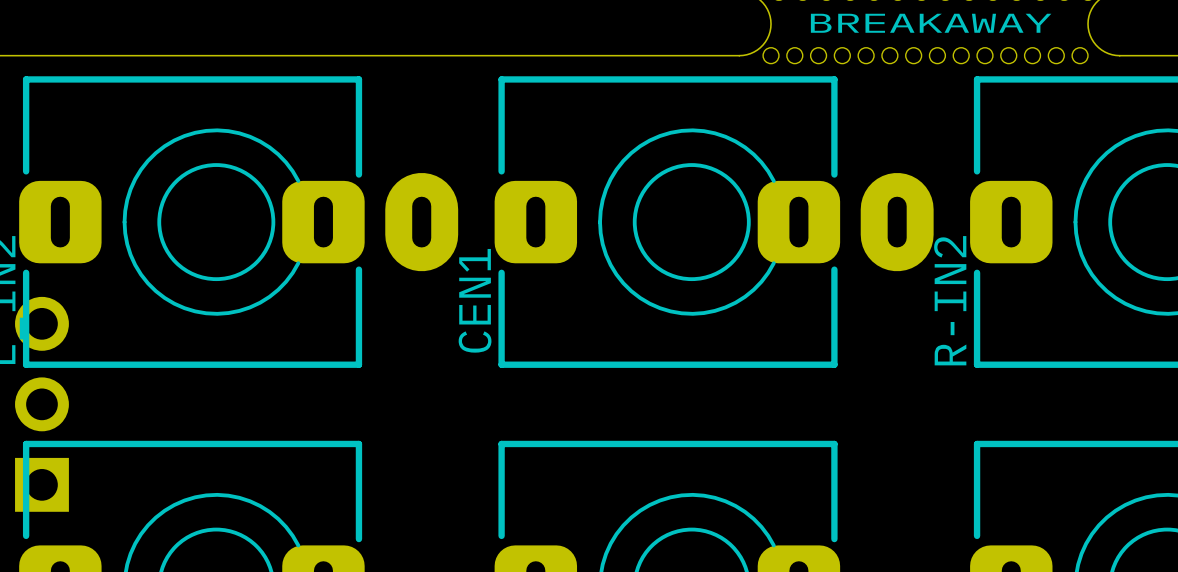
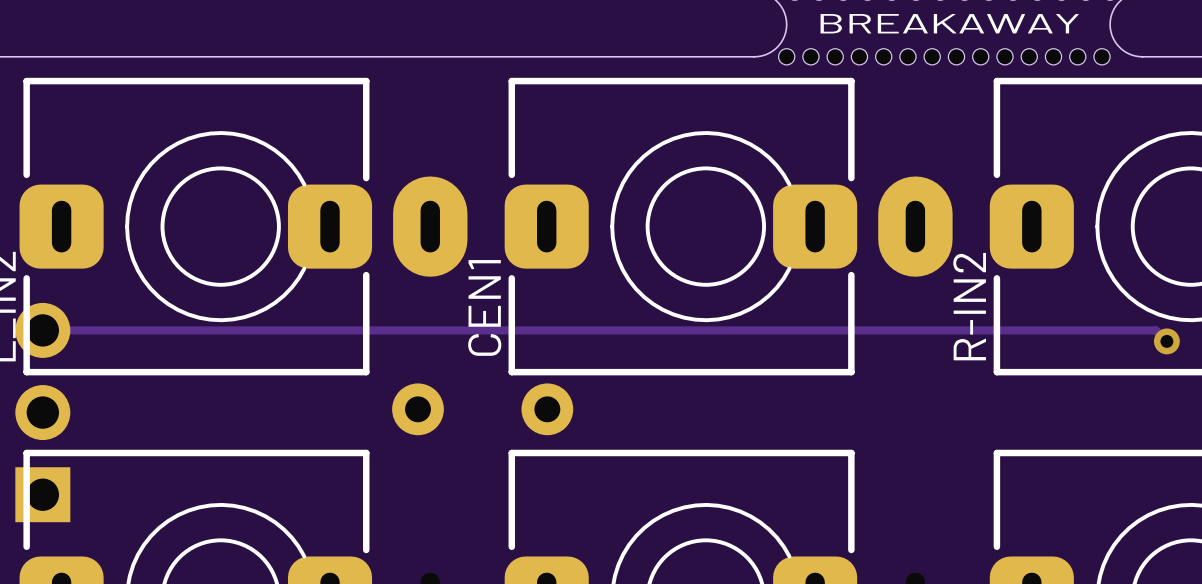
track: none -> (42, 330) (1155, 330) (1166, 341)
via: none -> (1166, 341)
part: none -> (482, 409)

